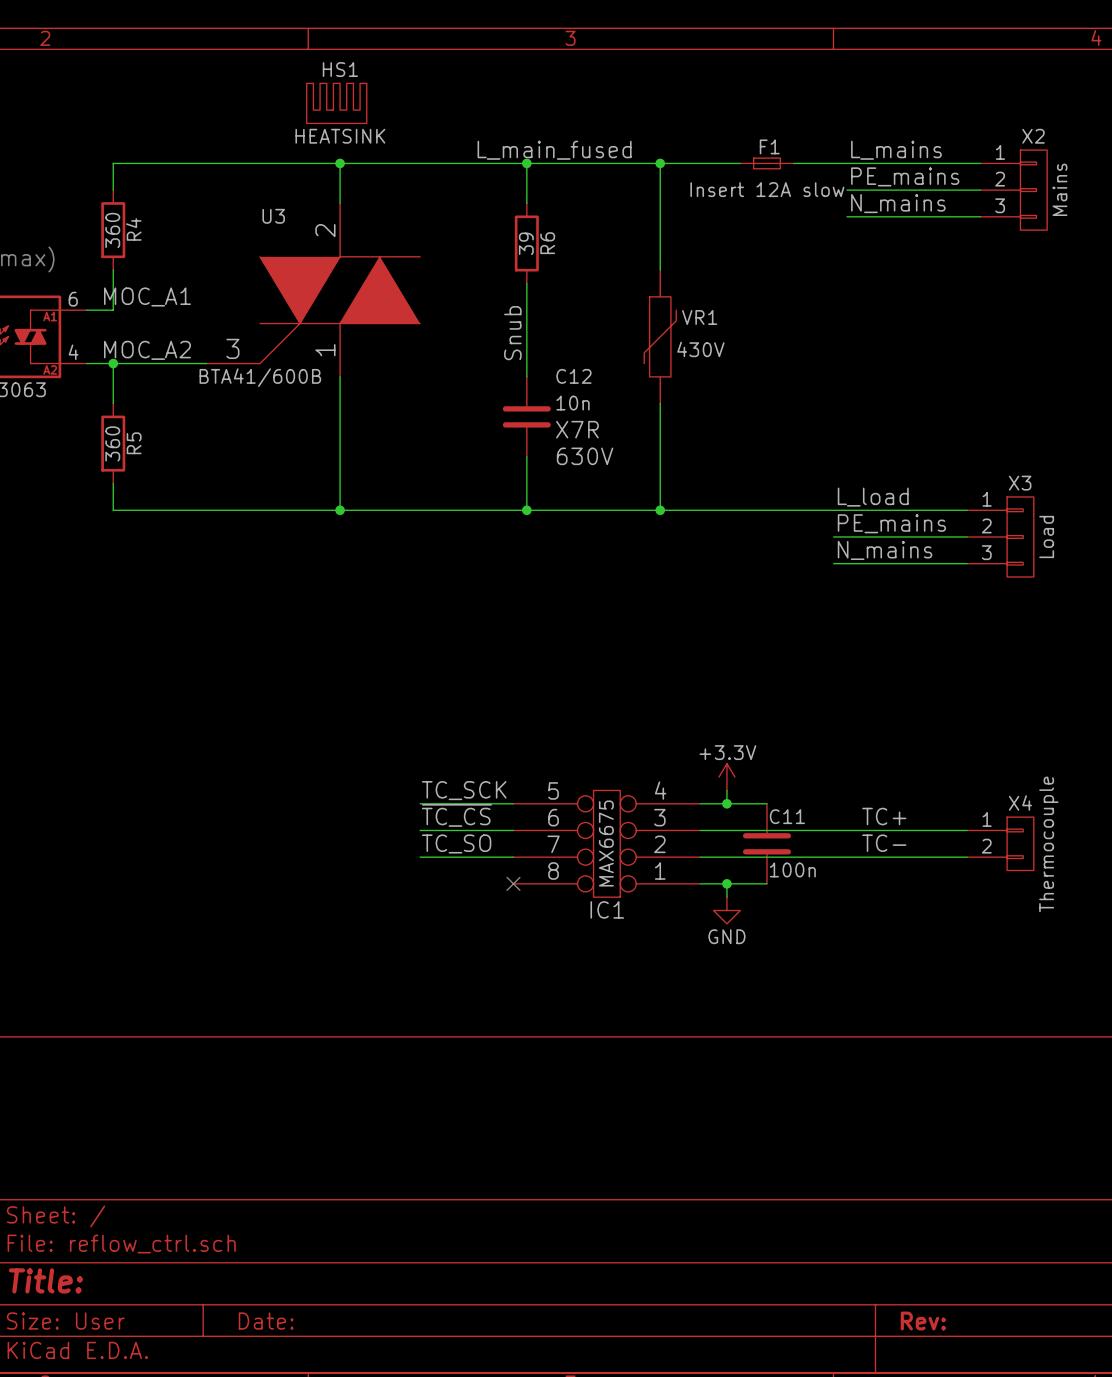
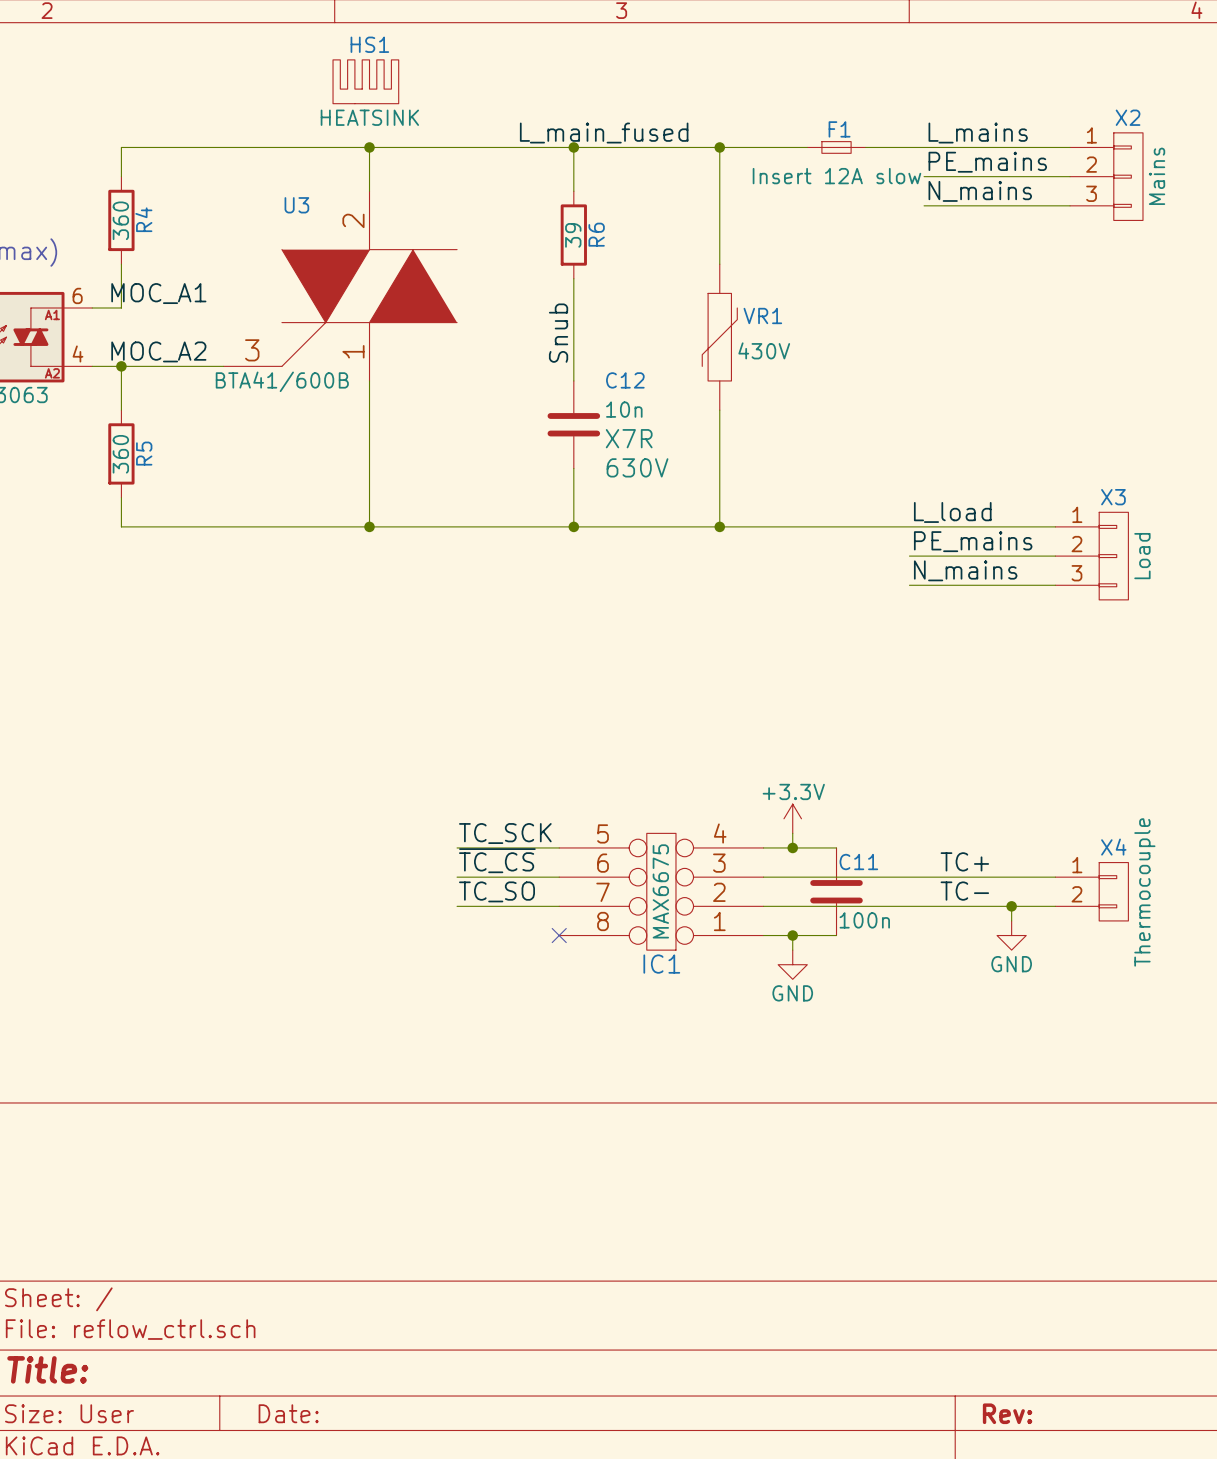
wire: none -> (1011, 906) (1011, 920)
junction: none -> (1011, 906)
power symbol: none -> GND (1011, 935)

